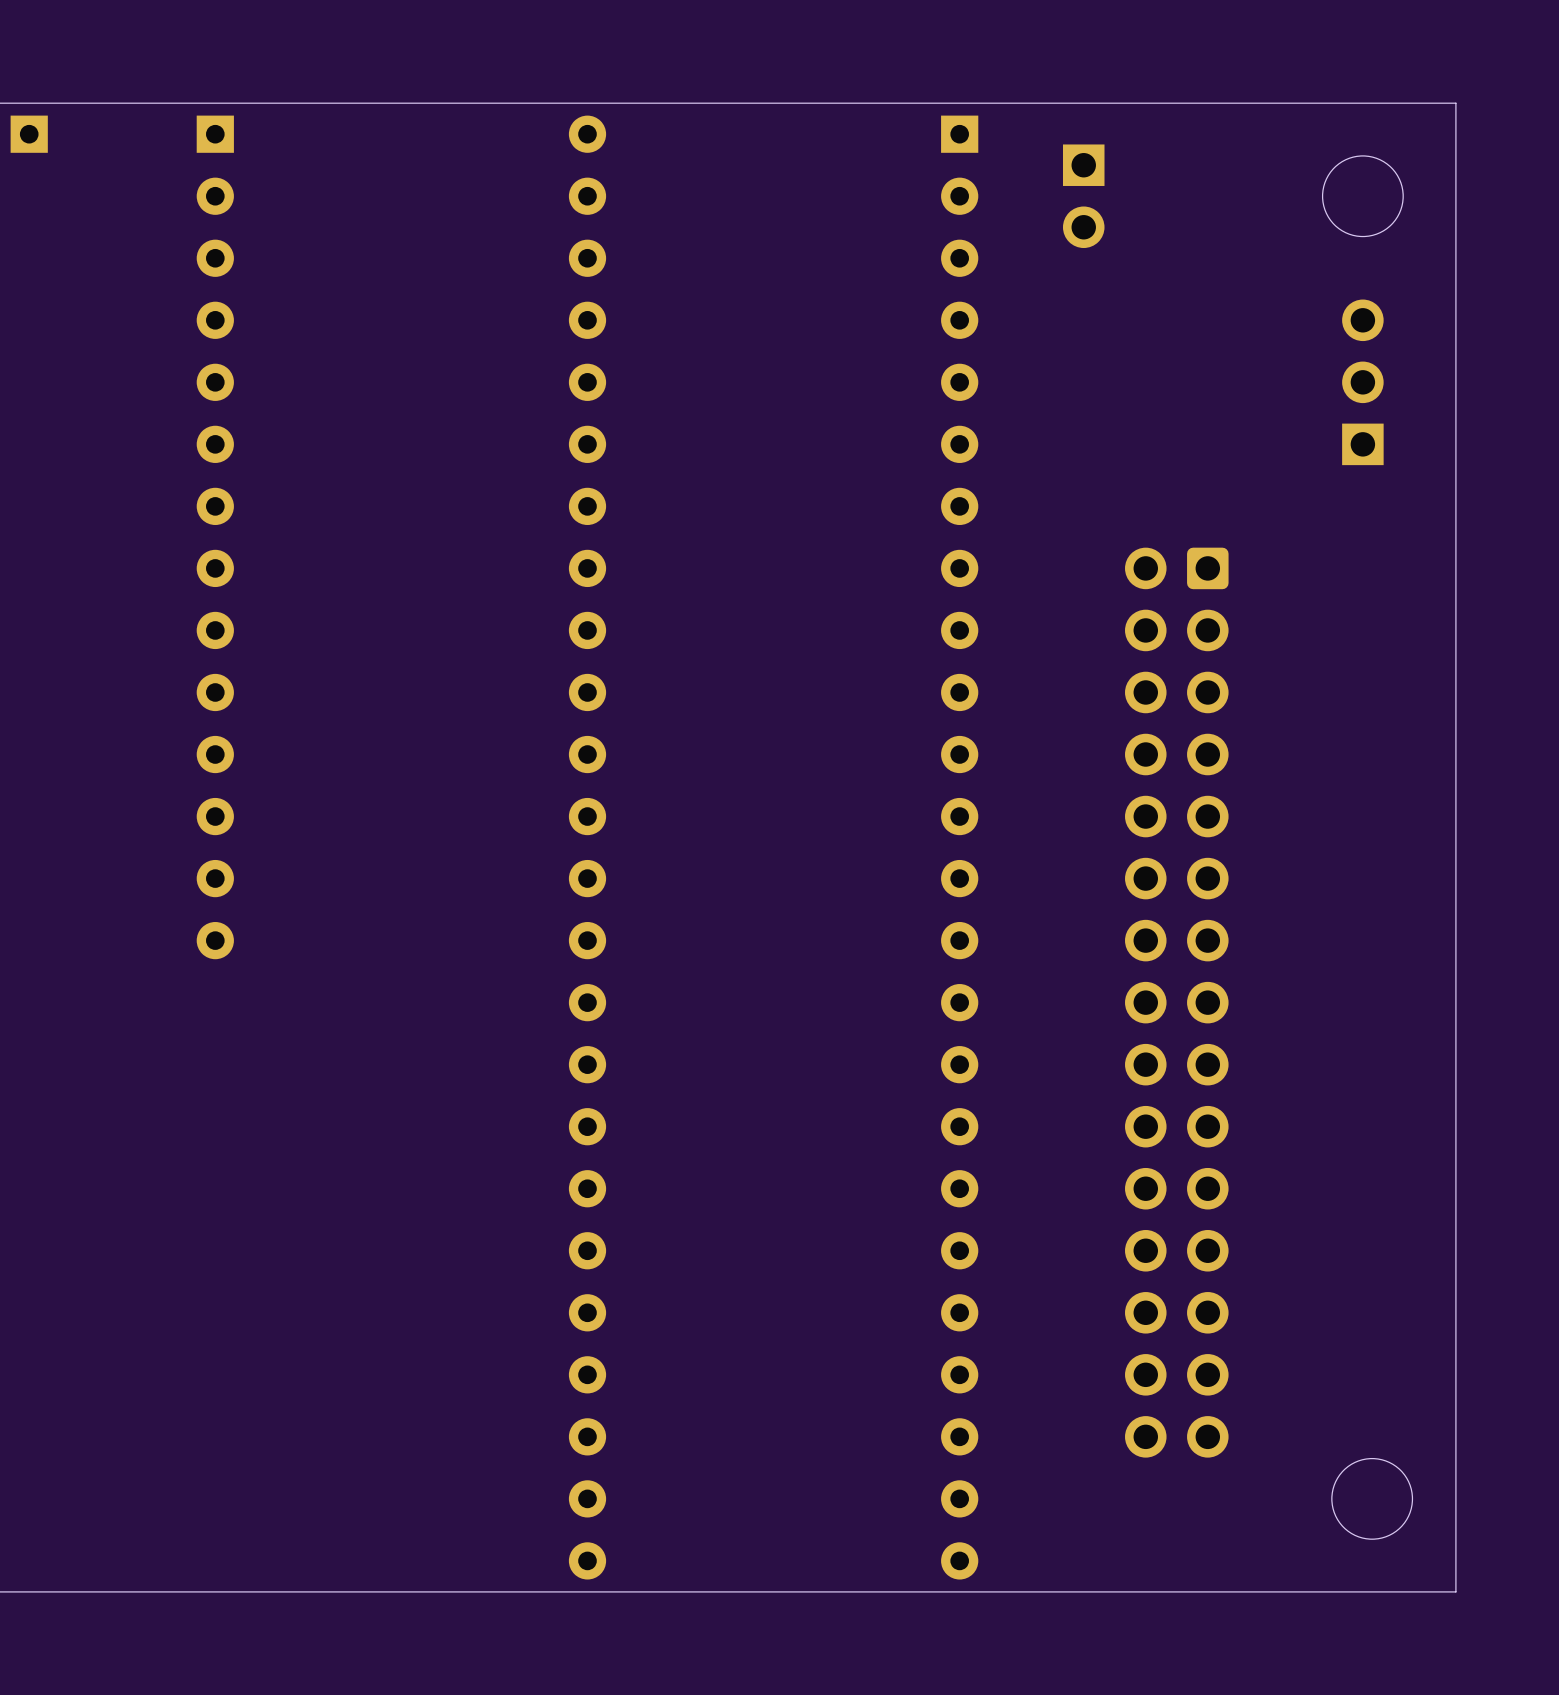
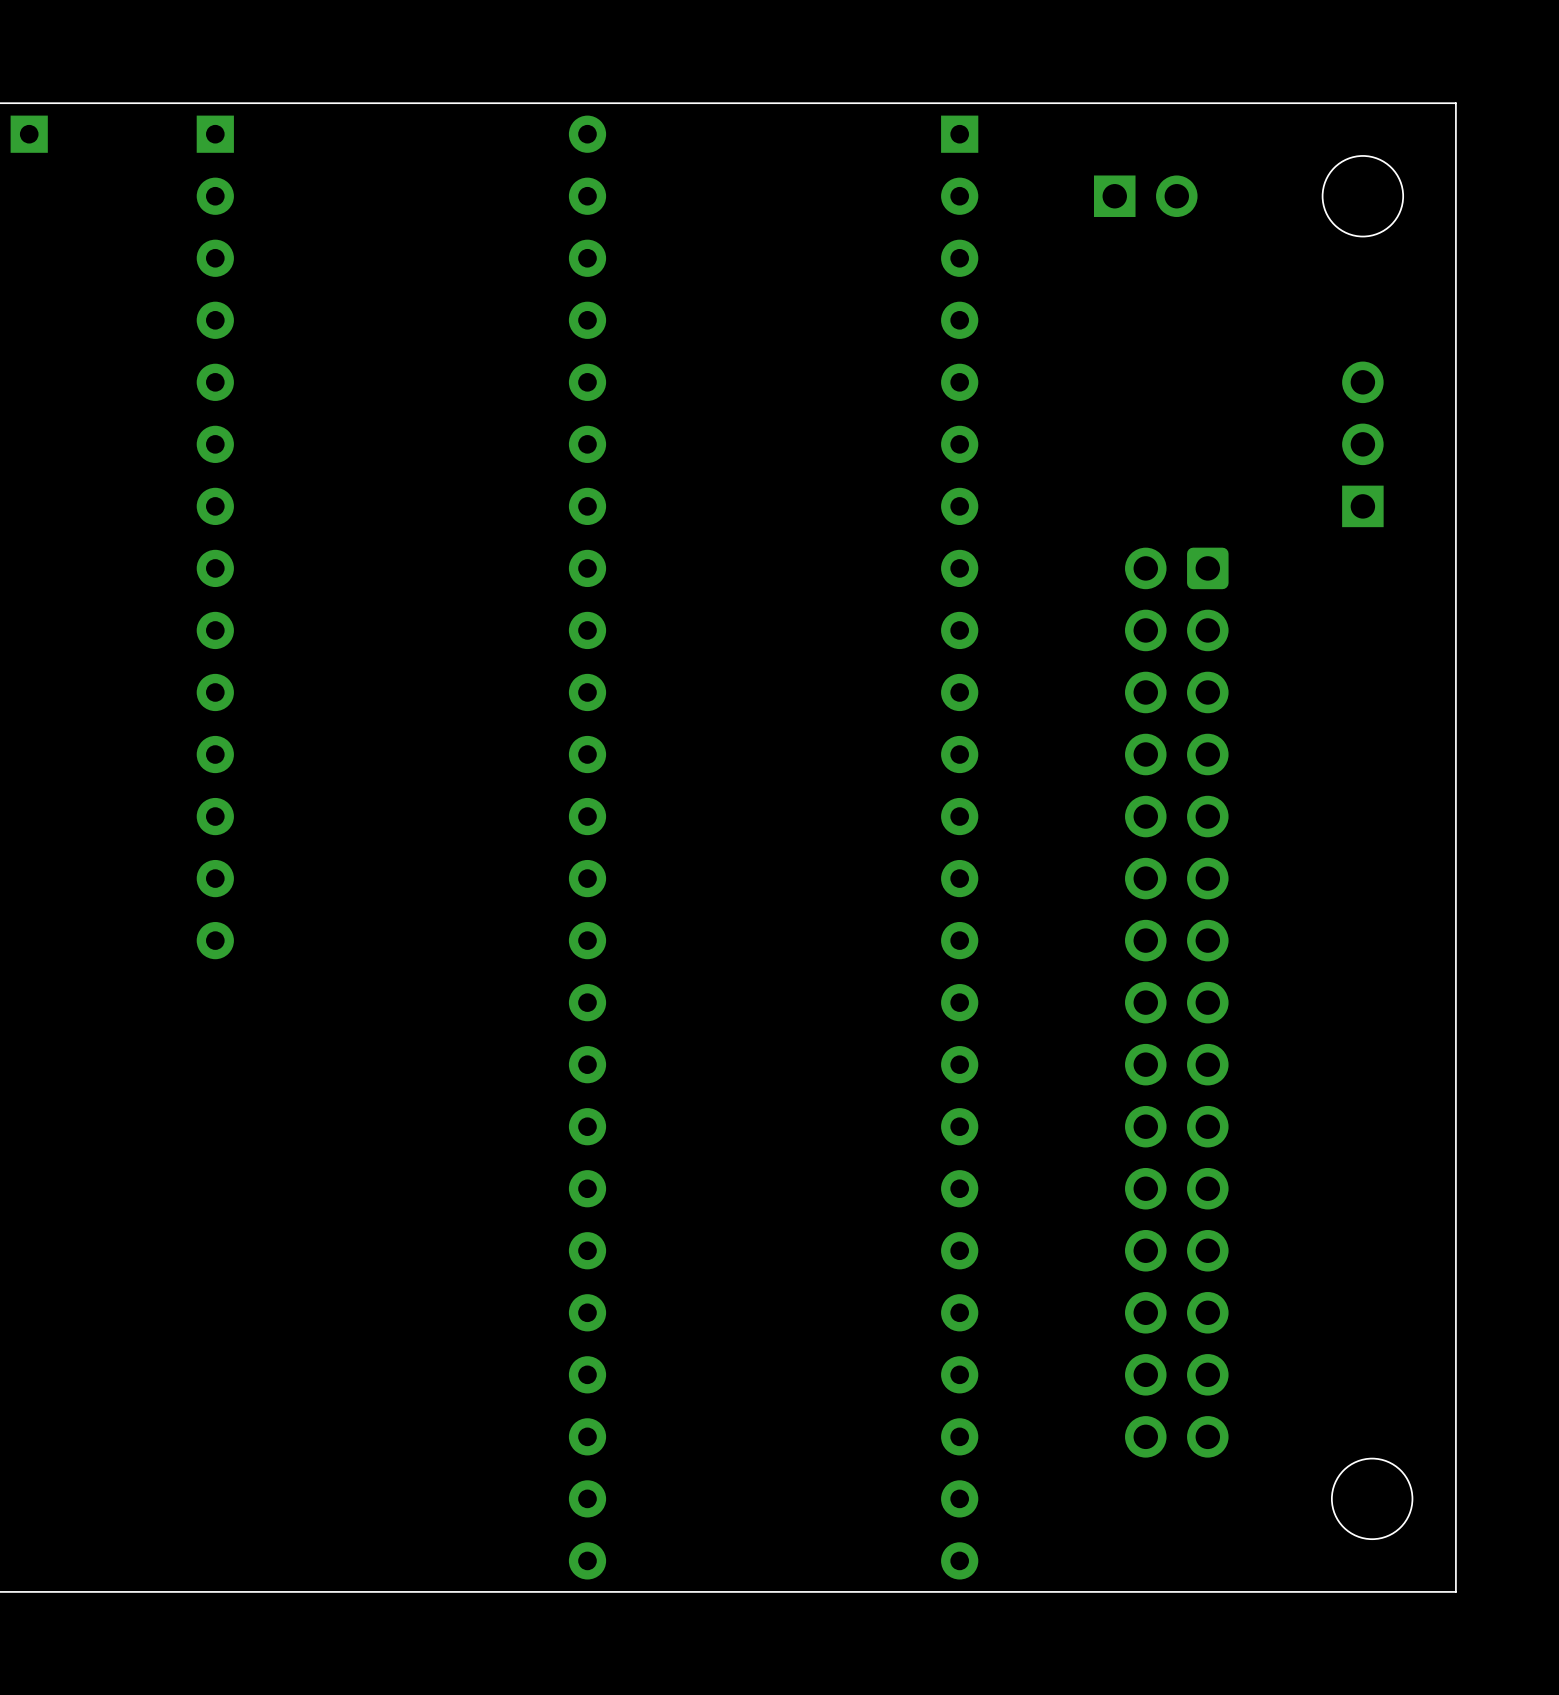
part rotation: 0° (1083, 196) -> 90° counterclockwise (1145, 196)
part position: (1362, 382) -> (1362, 444)

